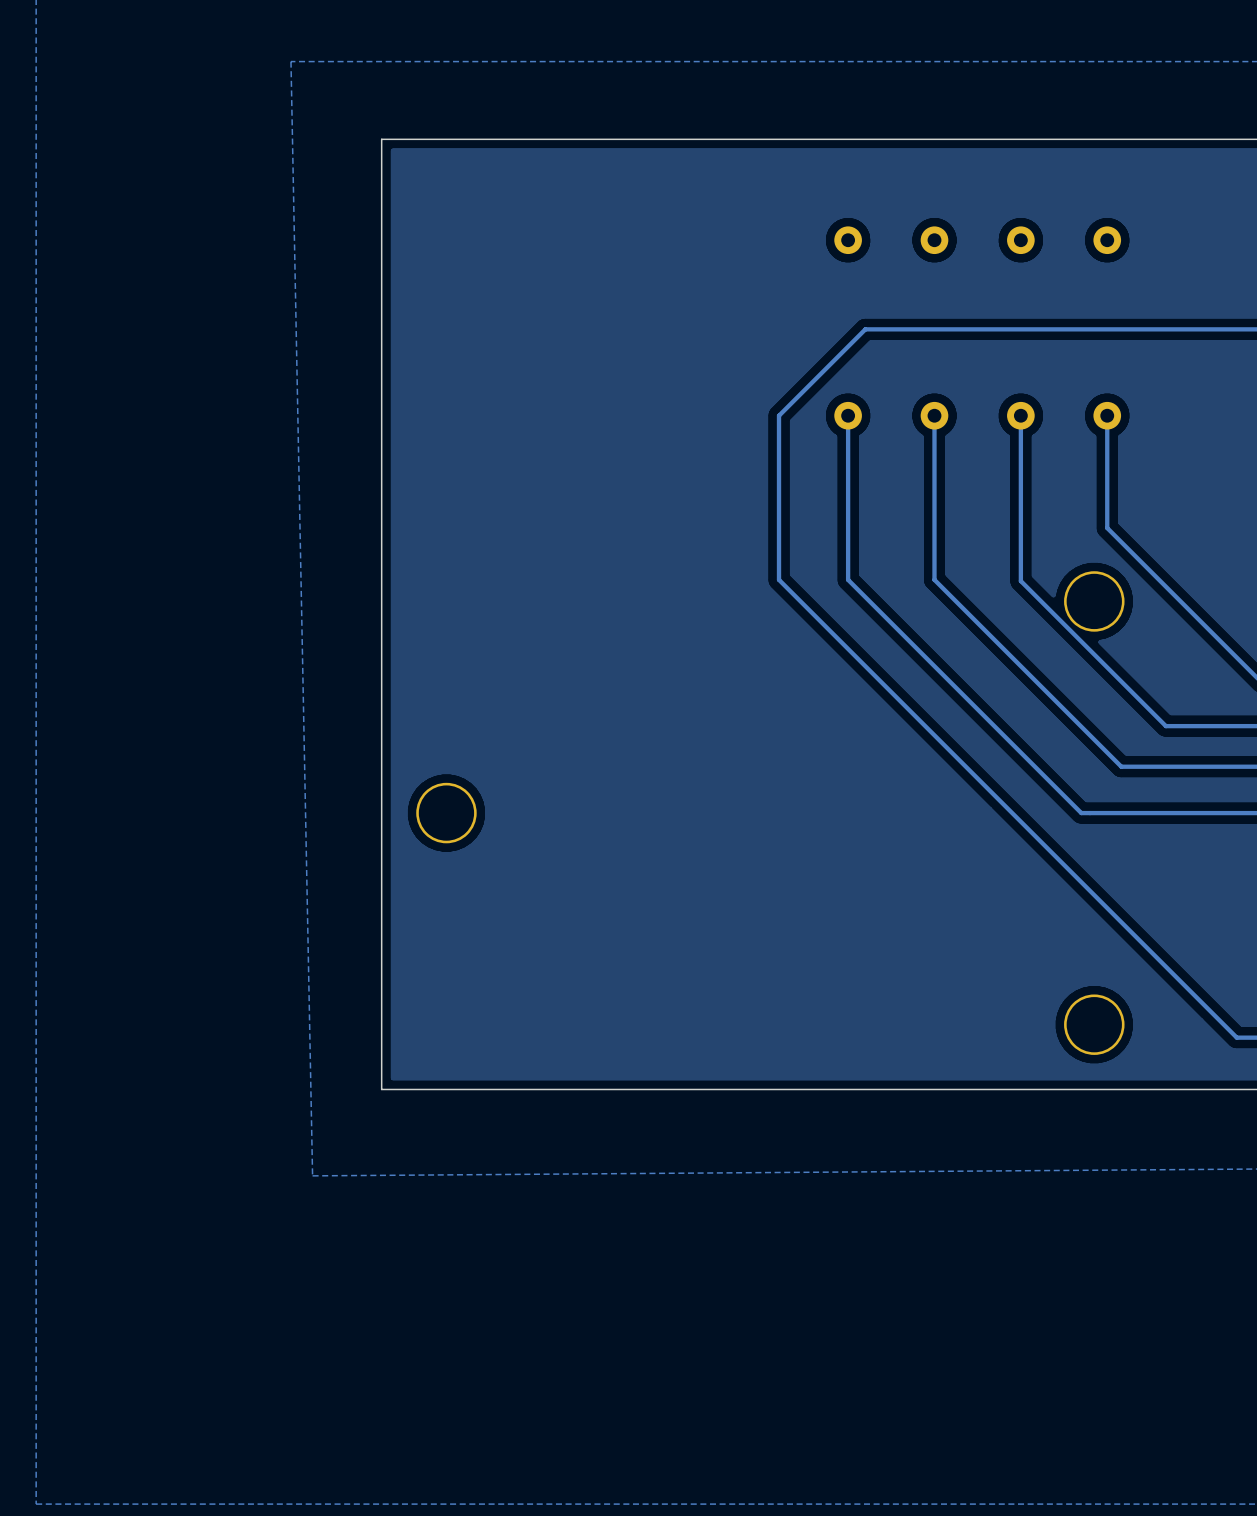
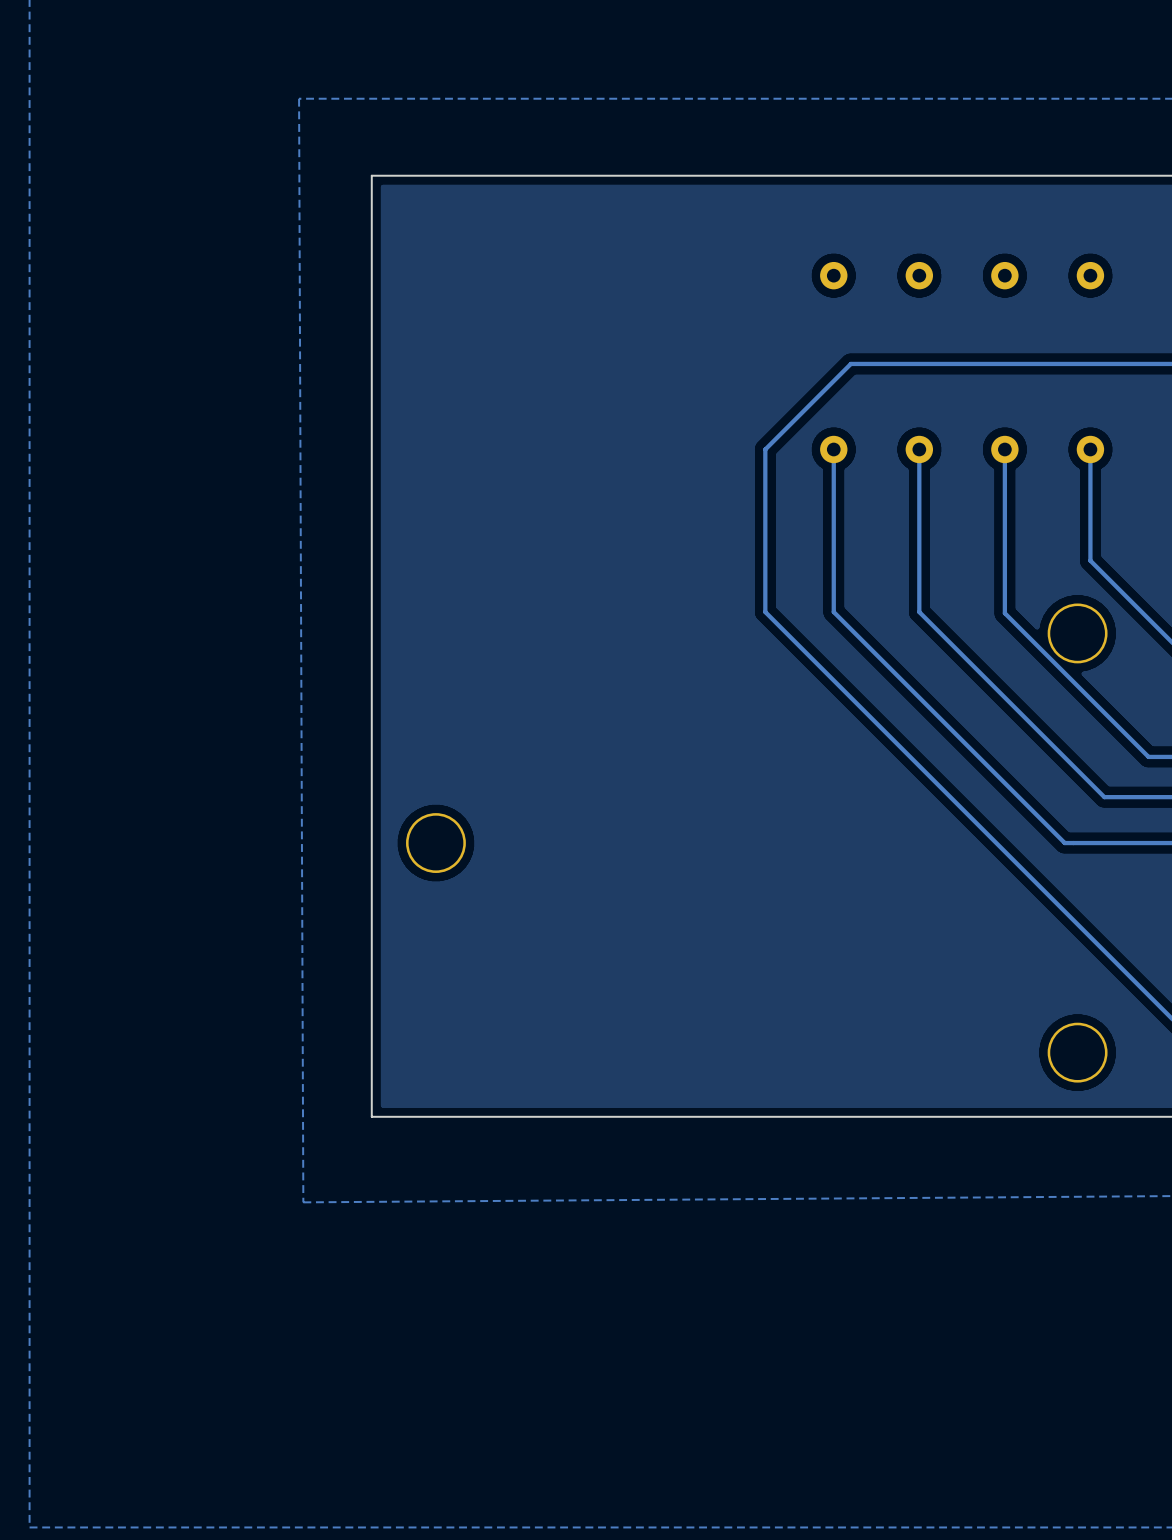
zone outline: (308, 61) (290, 61) (312, 1175) -> (299, 98) (303, 1202)

